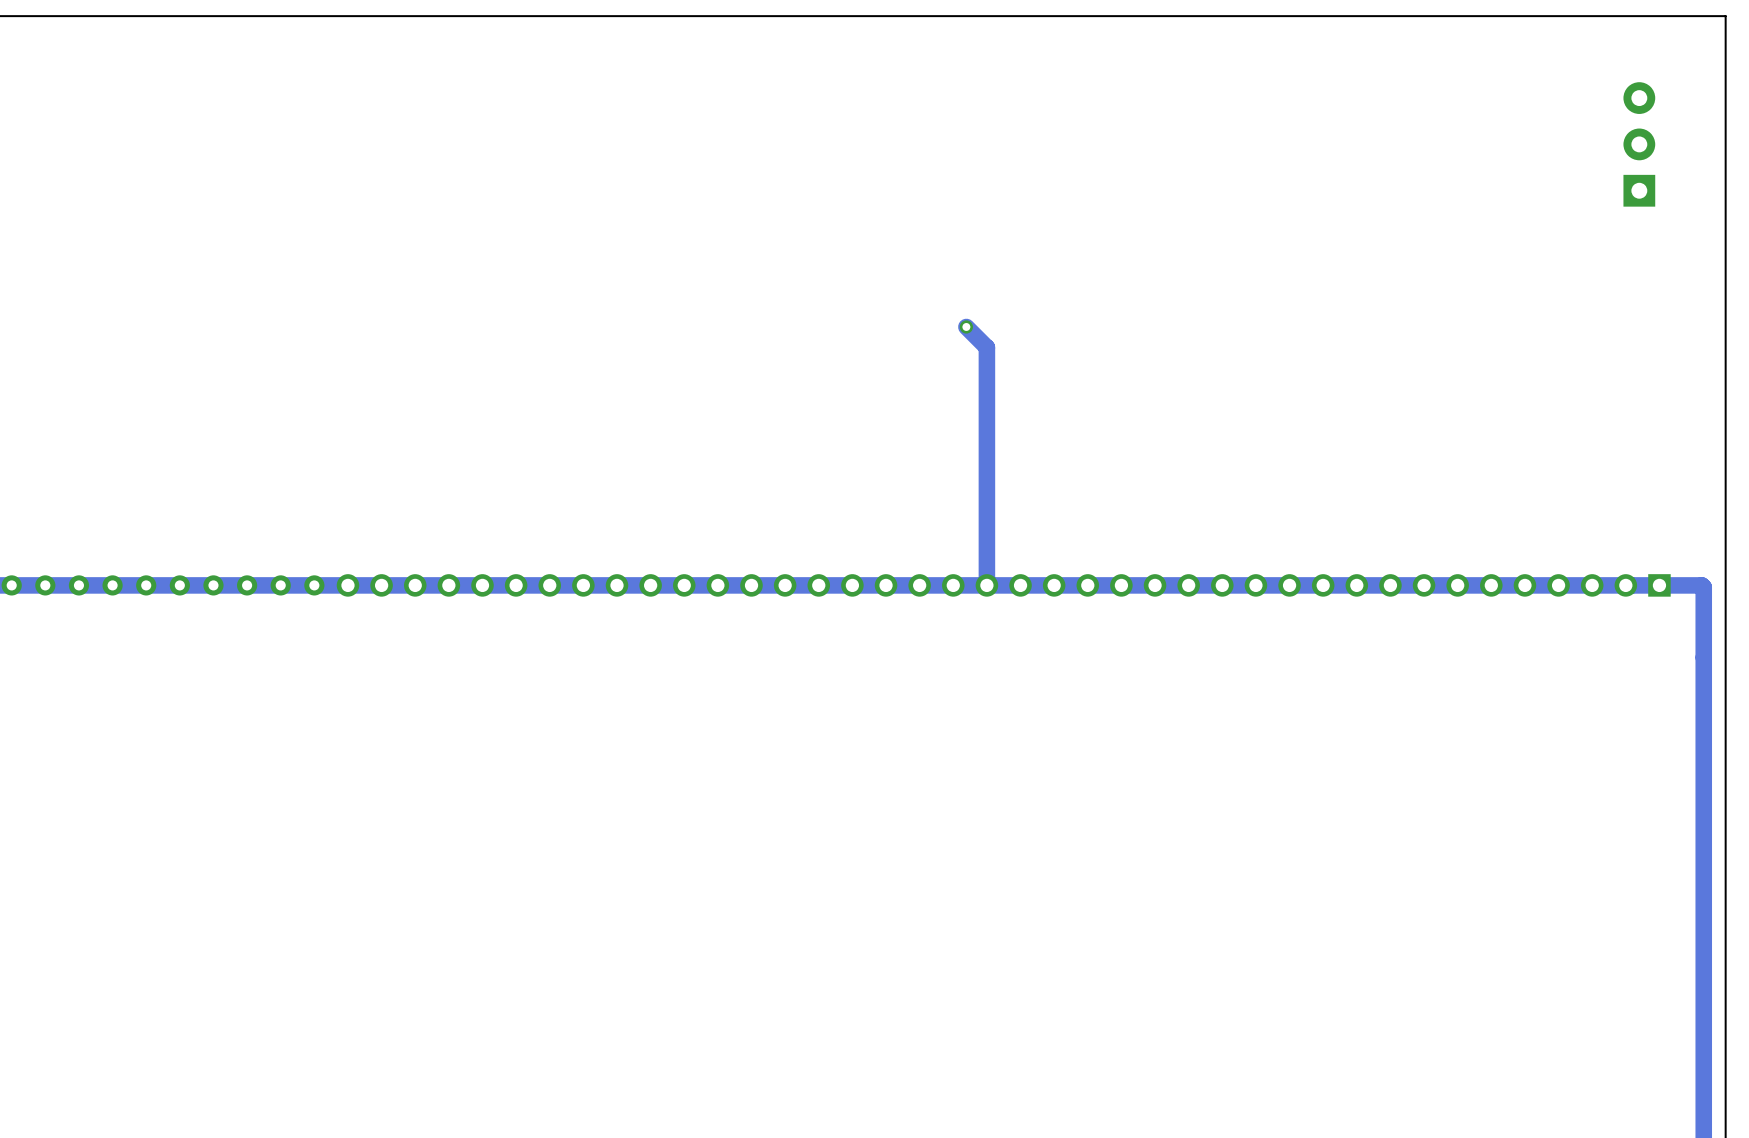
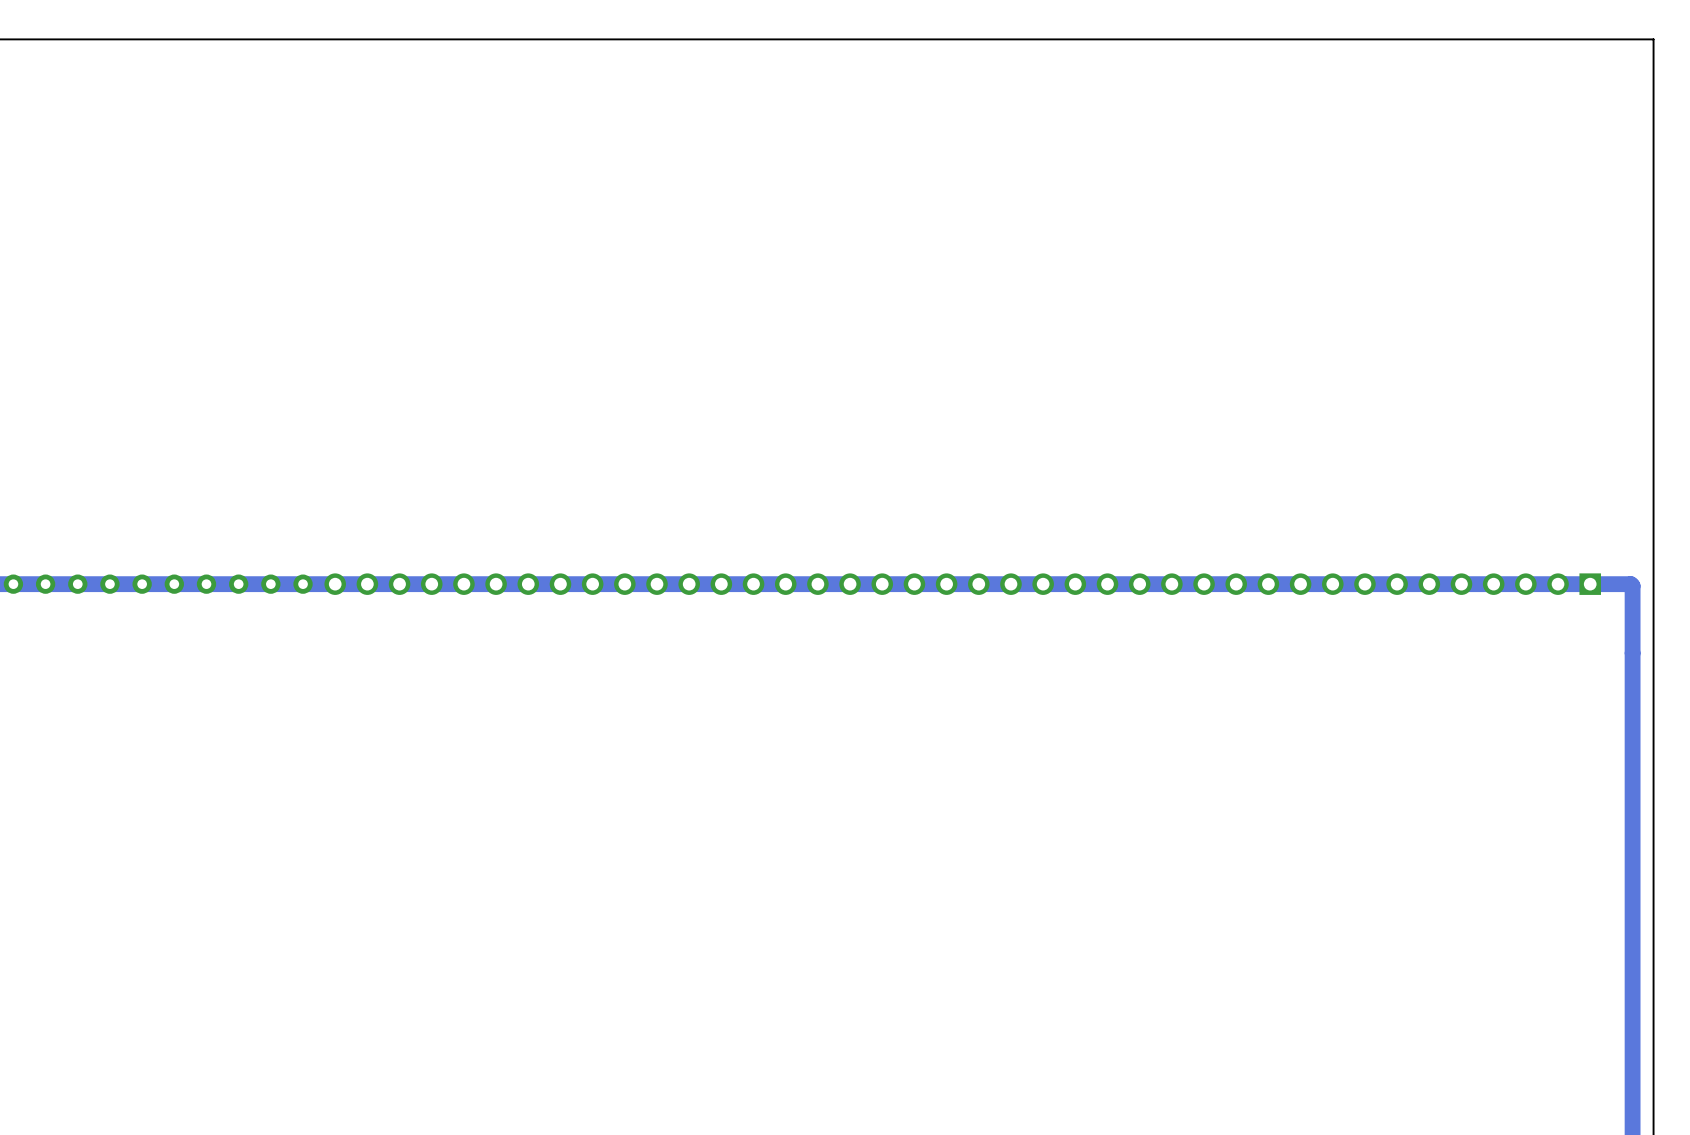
part: (1639, 144) -> none
track: (966, 326) (986, 347) (986, 585) -> none
via: (966, 326) -> none

